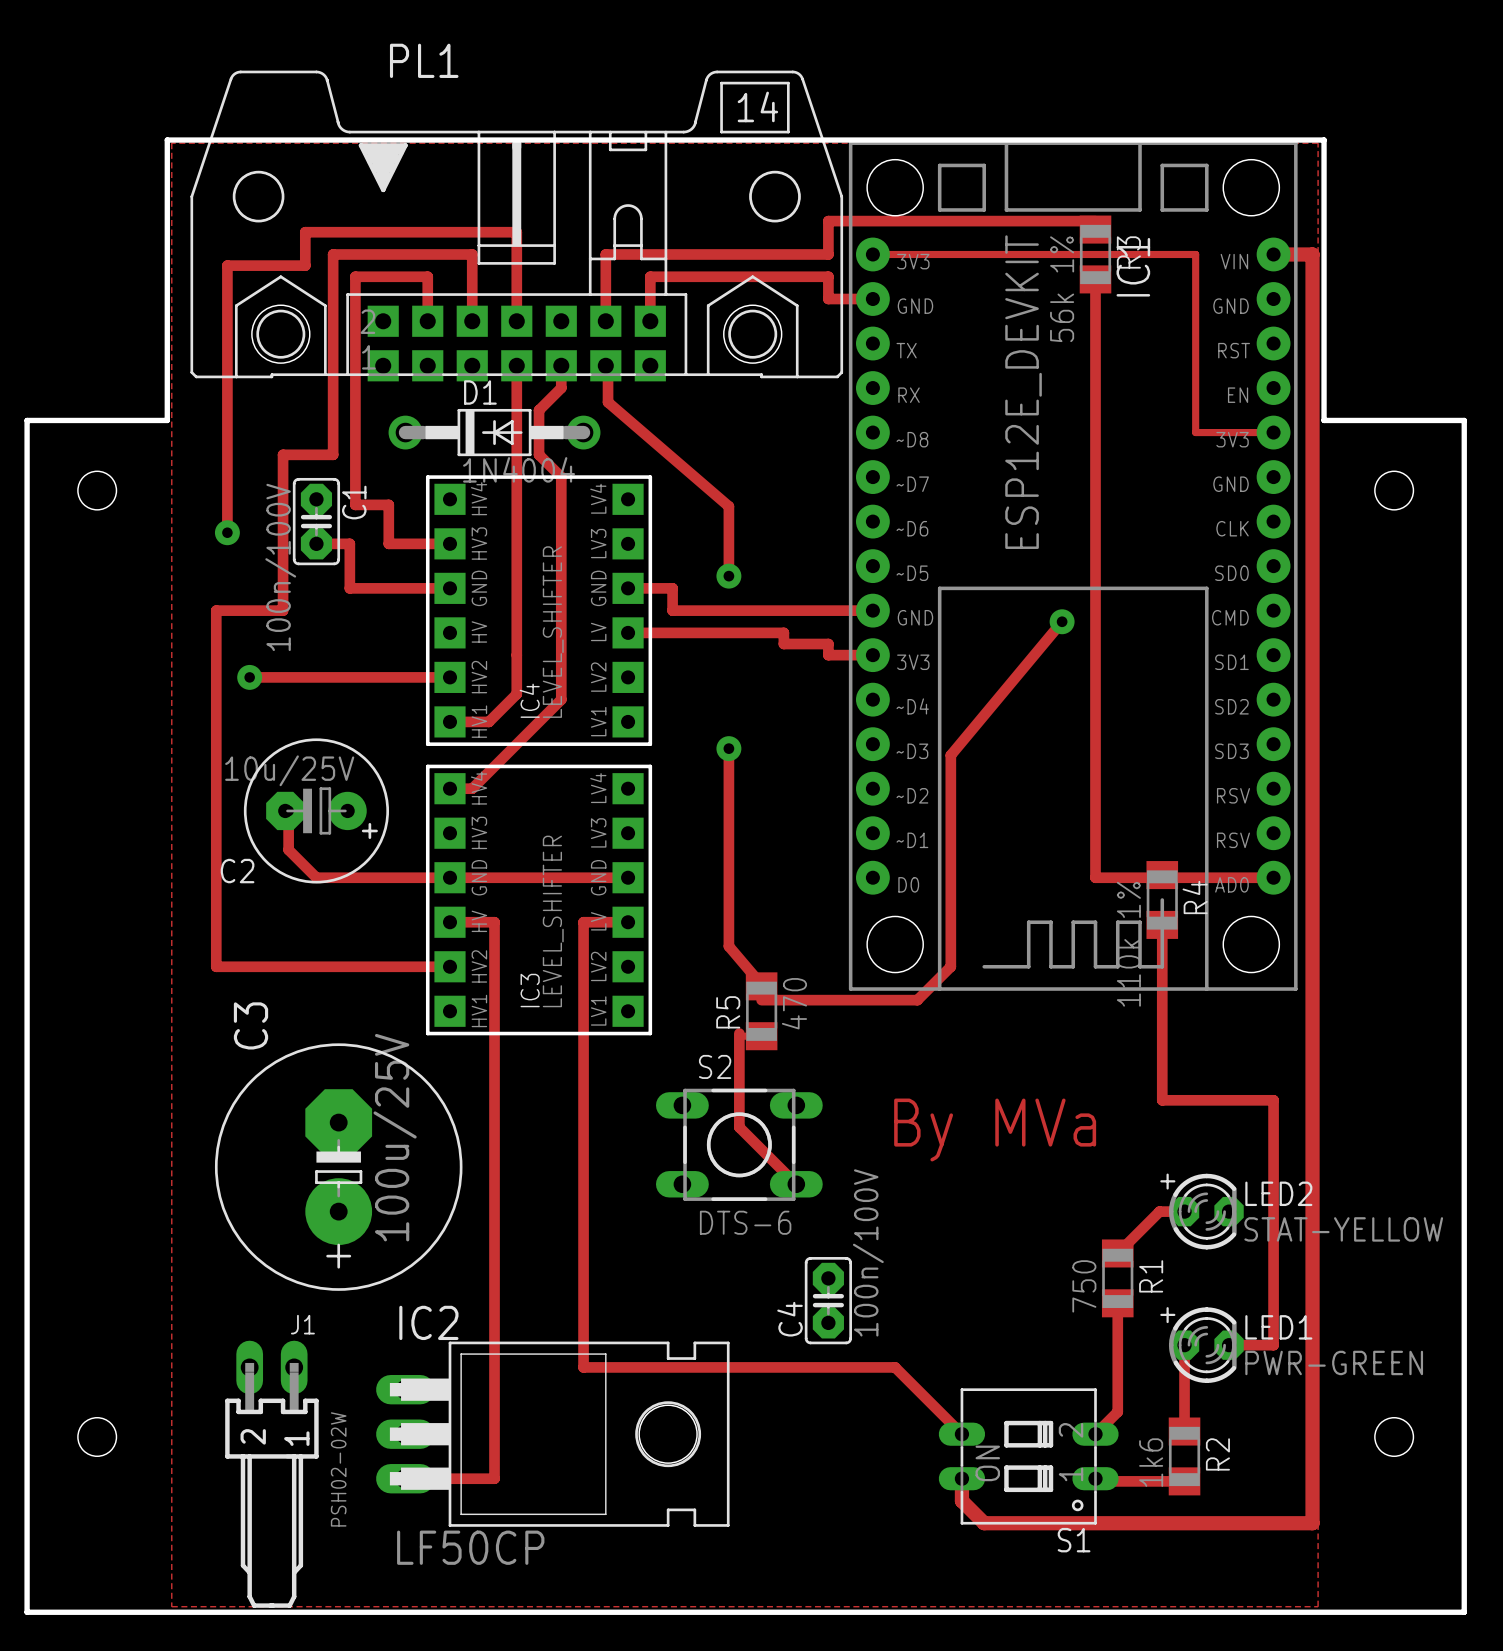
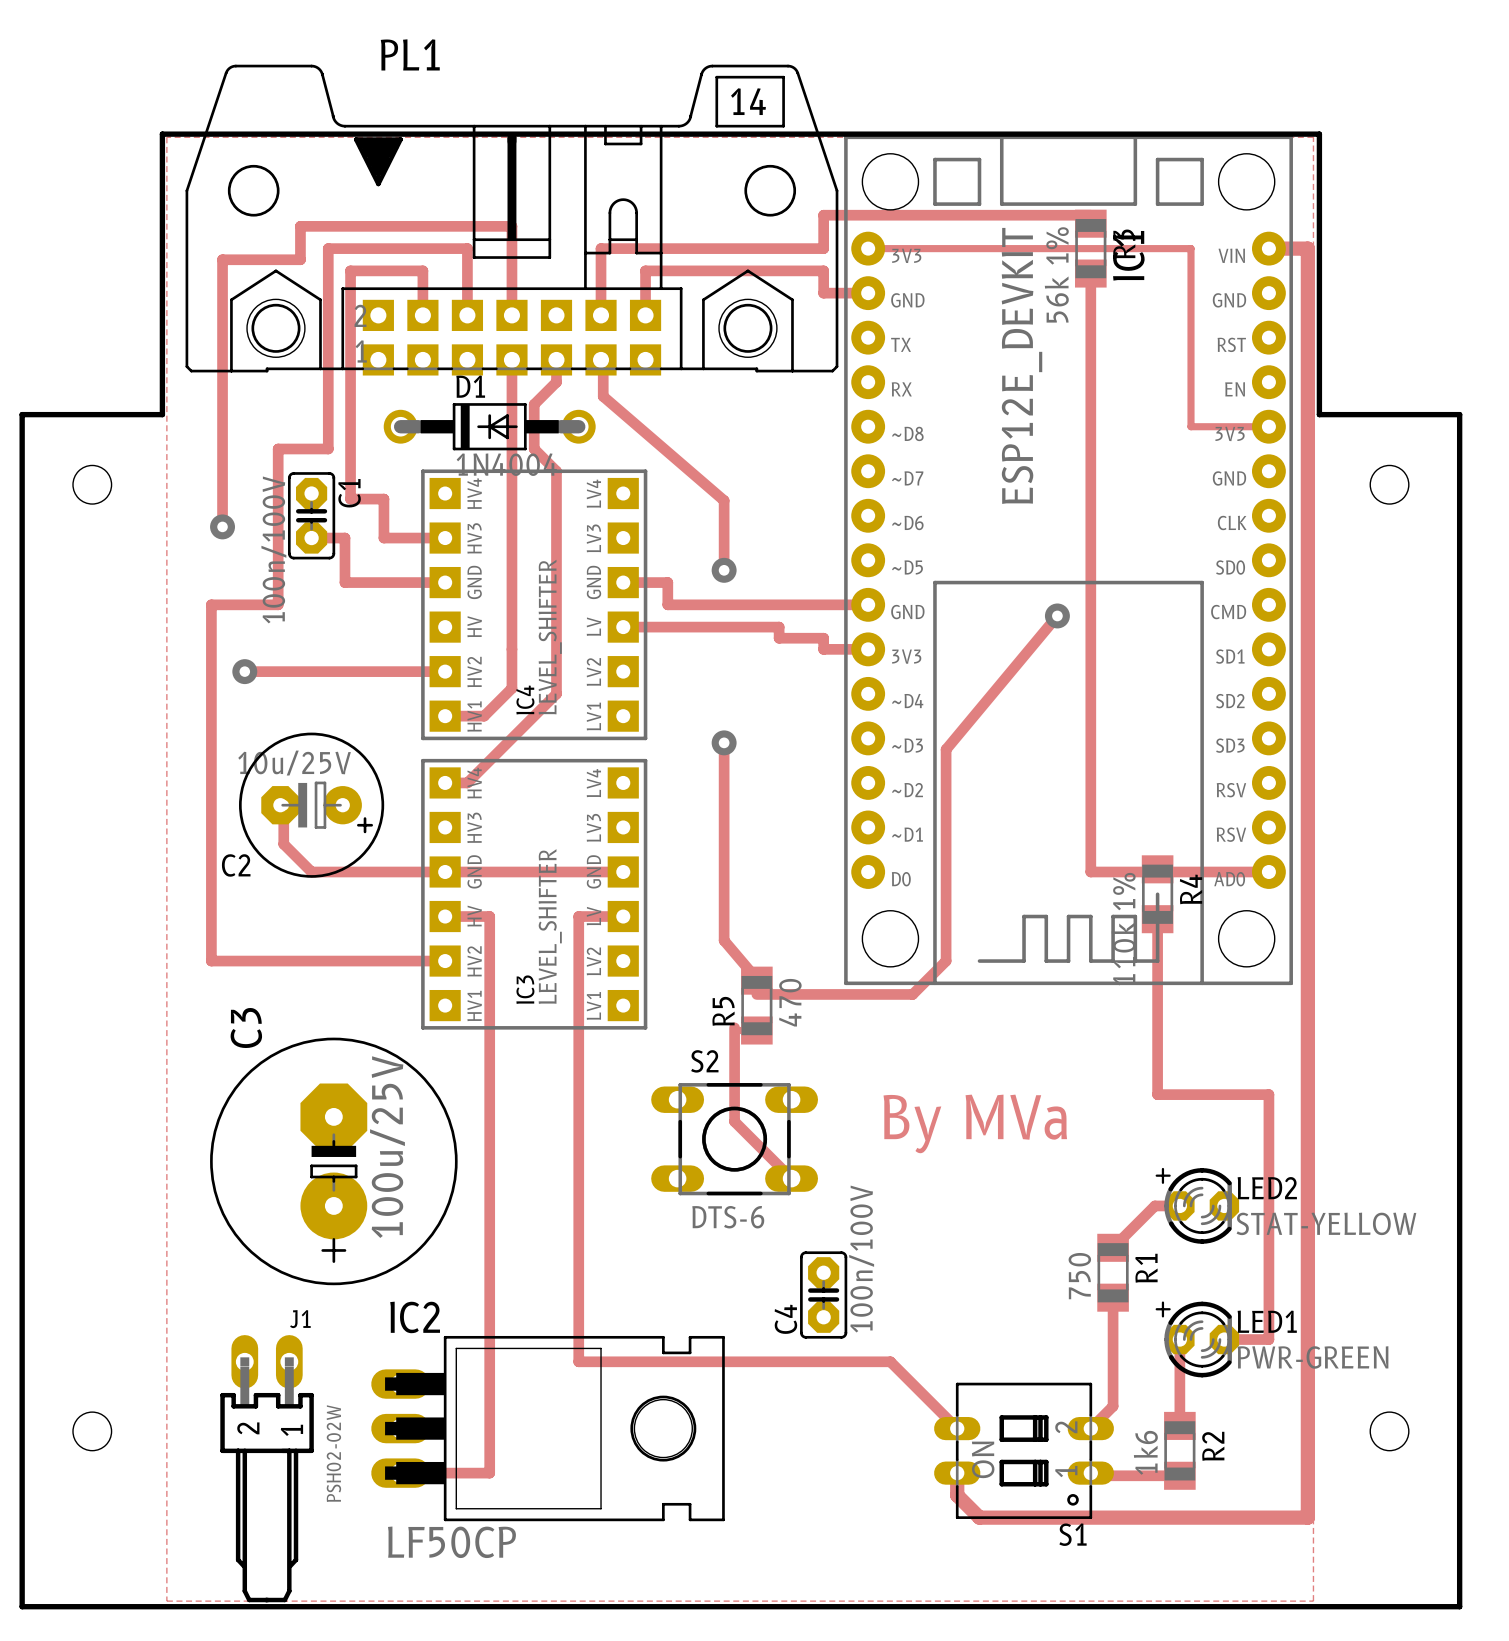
IC4 footprint: [425, 475, 653, 746] -> [421, 469, 648, 741]
IC3 footprint: [425, 764, 653, 1036] -> [421, 758, 648, 1030]

